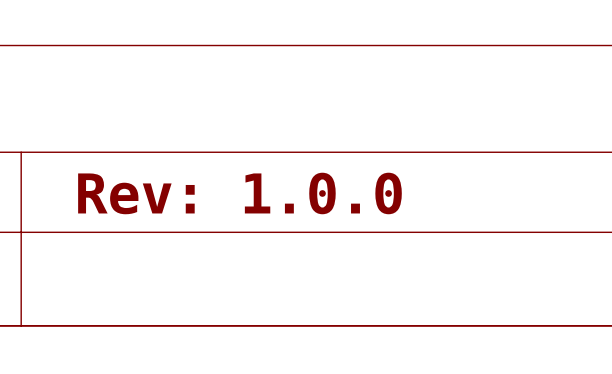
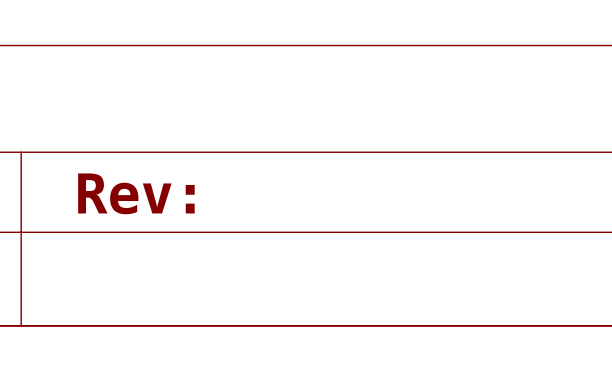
title block: Rev: 1.0.0 (239, 193) -> Rev: (136, 193)

